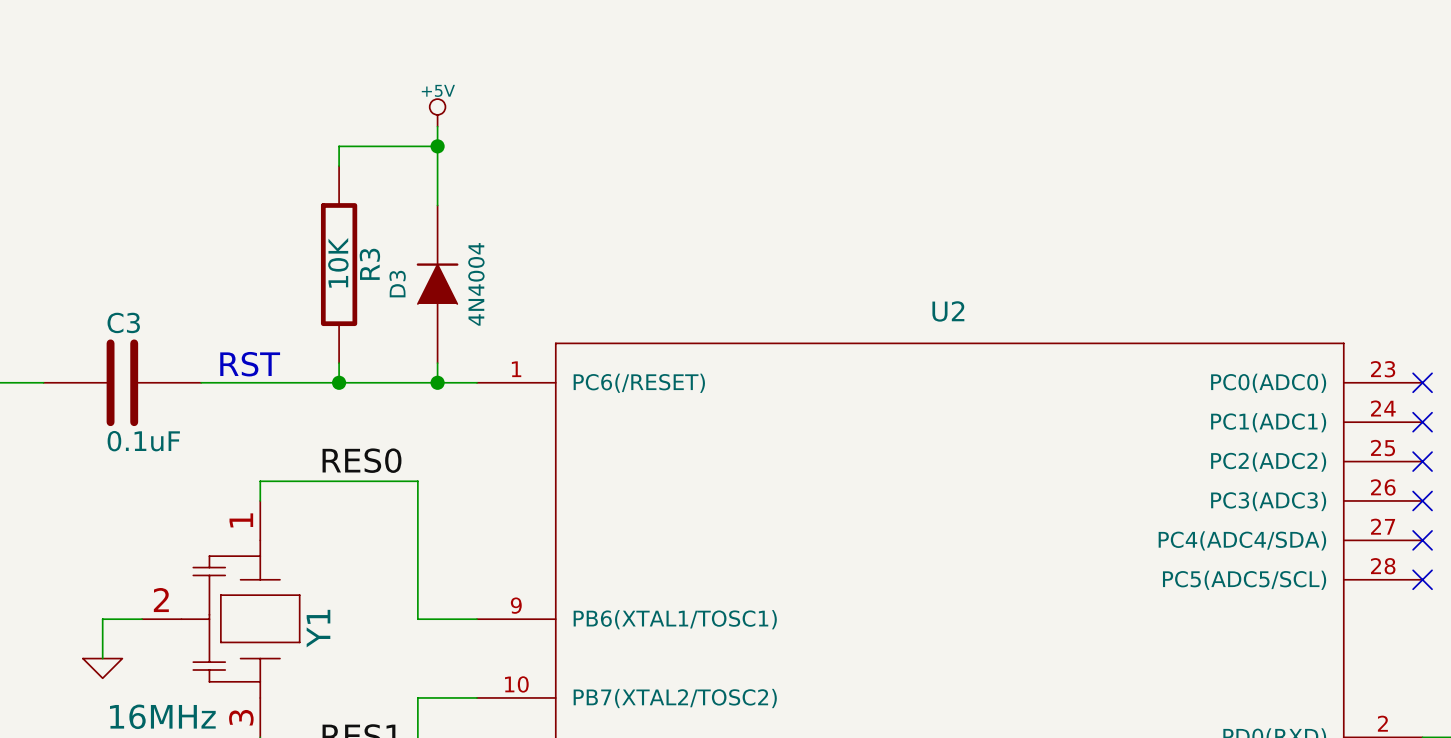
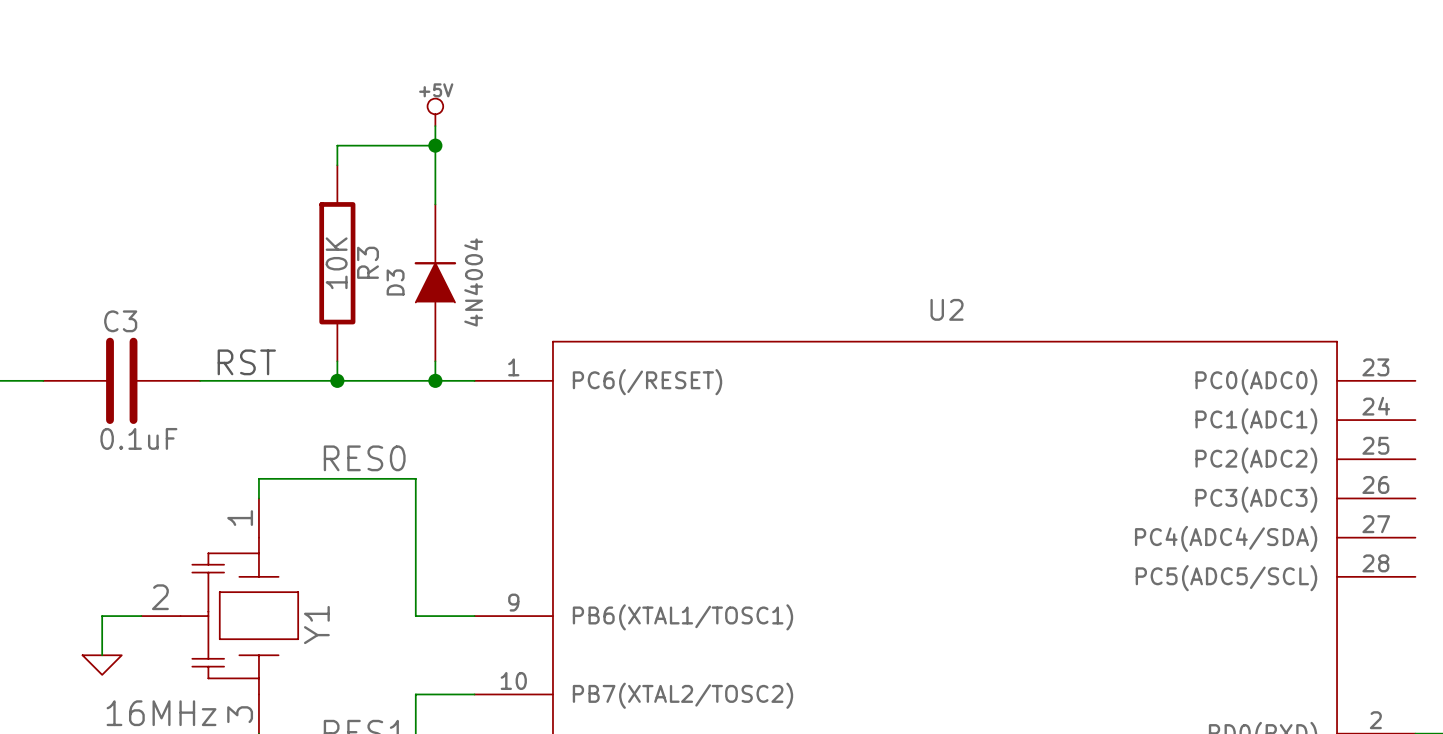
no-connect mark: (1422, 382) -> none
no-connect mark: (1422, 422) -> none
no-connect mark: (1422, 461) -> none
no-connect mark: (1422, 500) -> none
no-connect mark: (1422, 540) -> none
no-connect mark: (1422, 579) -> none

